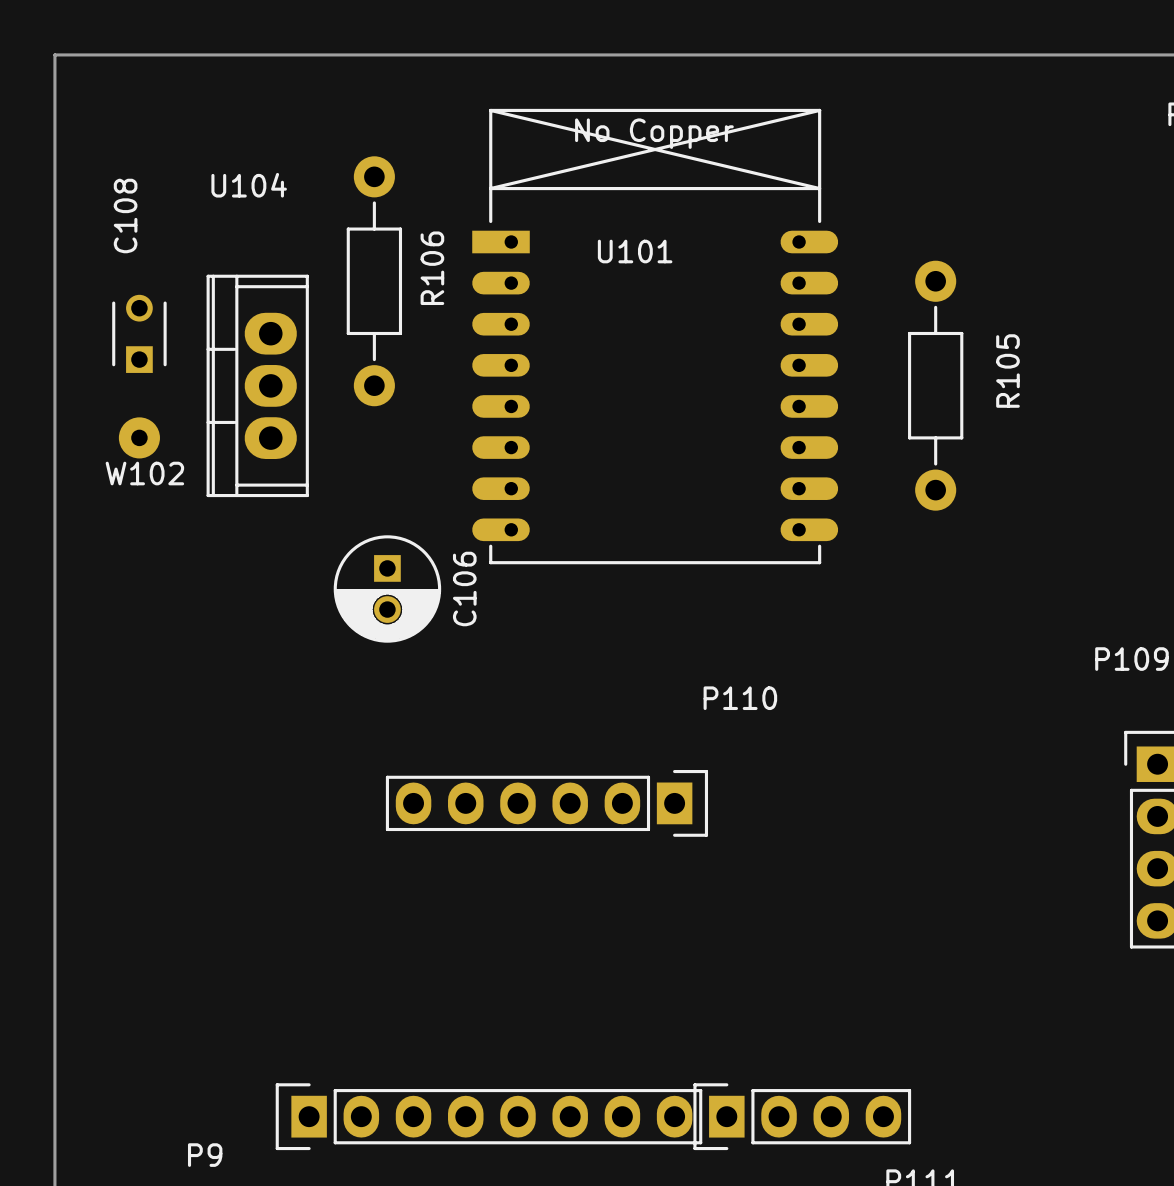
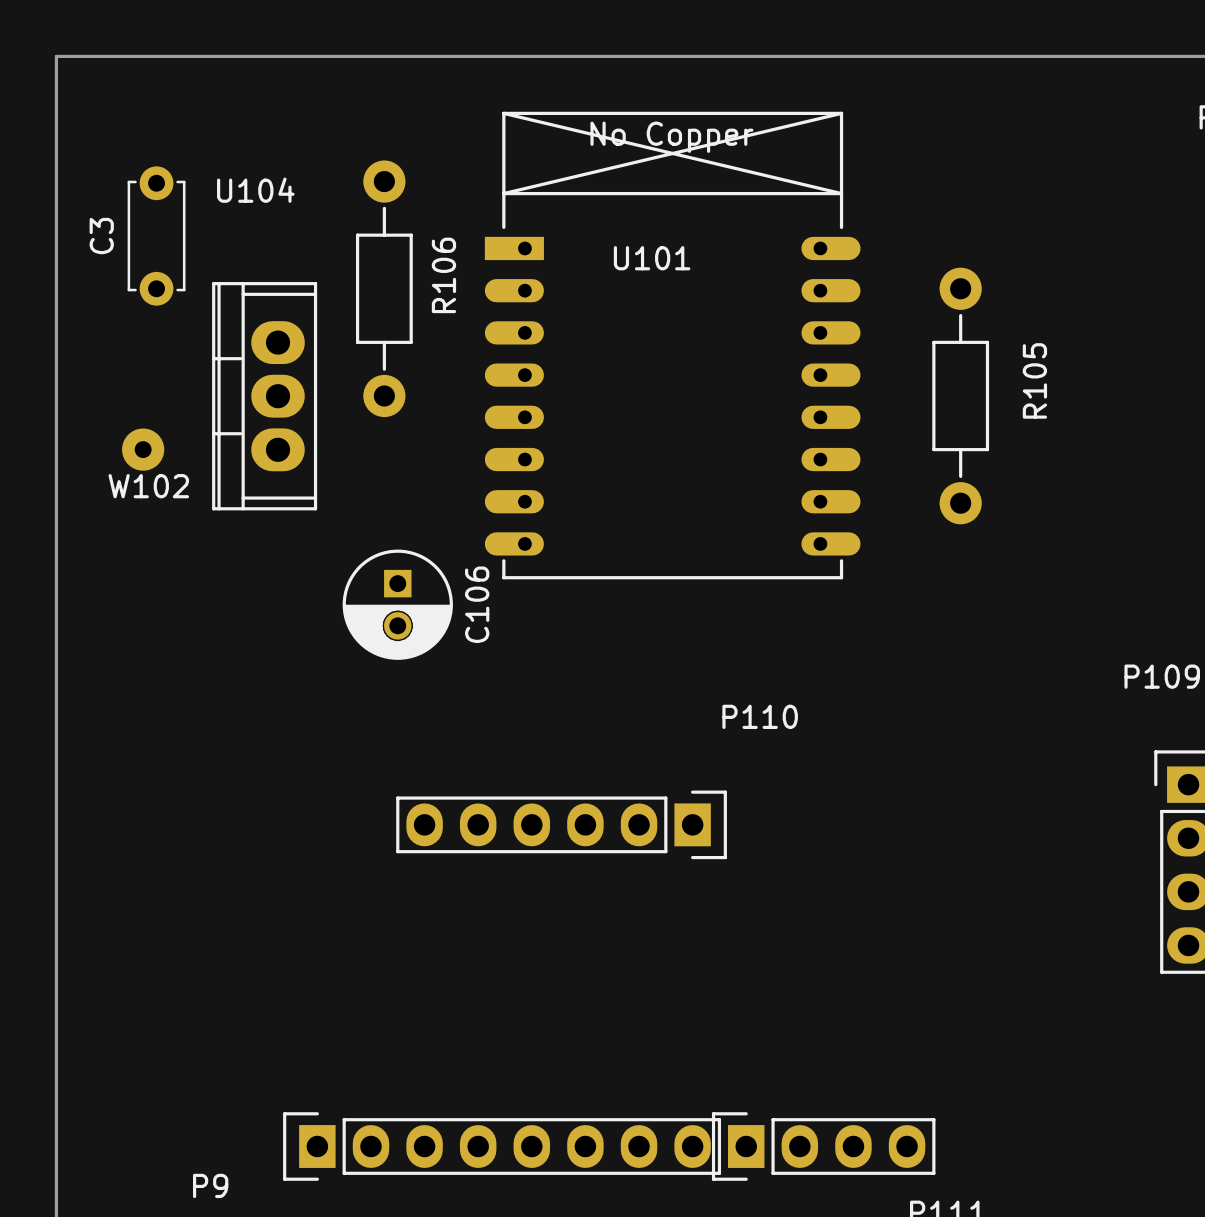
C3: none -> (156, 236)
C108: (139, 333) -> none

